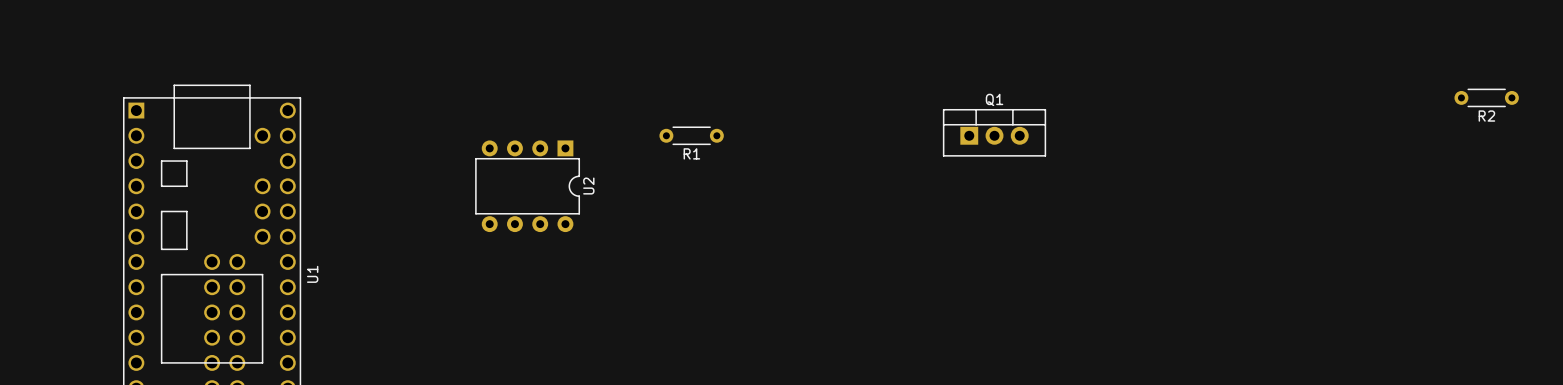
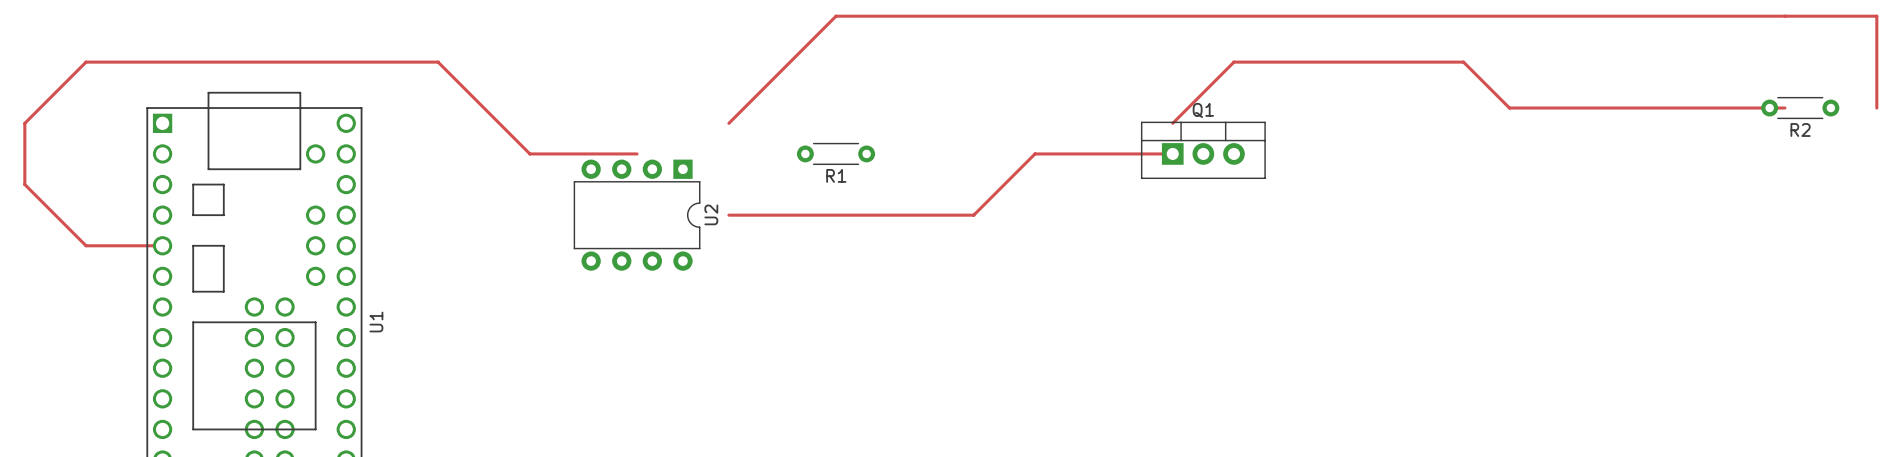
track: none -> (1784, 108) (1509, 108) (1463, 62) (1233, 62) (1172, 123)
track: none -> (1876, 108) (1876, 16) (836, 16) (728, 123)
track: none -> (637, 153) (529, 153) (438, 62) (86, 62) (24, 123) (24, 184) (86, 245) (162, 245)
track: none -> (1172, 153) (1035, 153) (973, 215) (728, 215)

